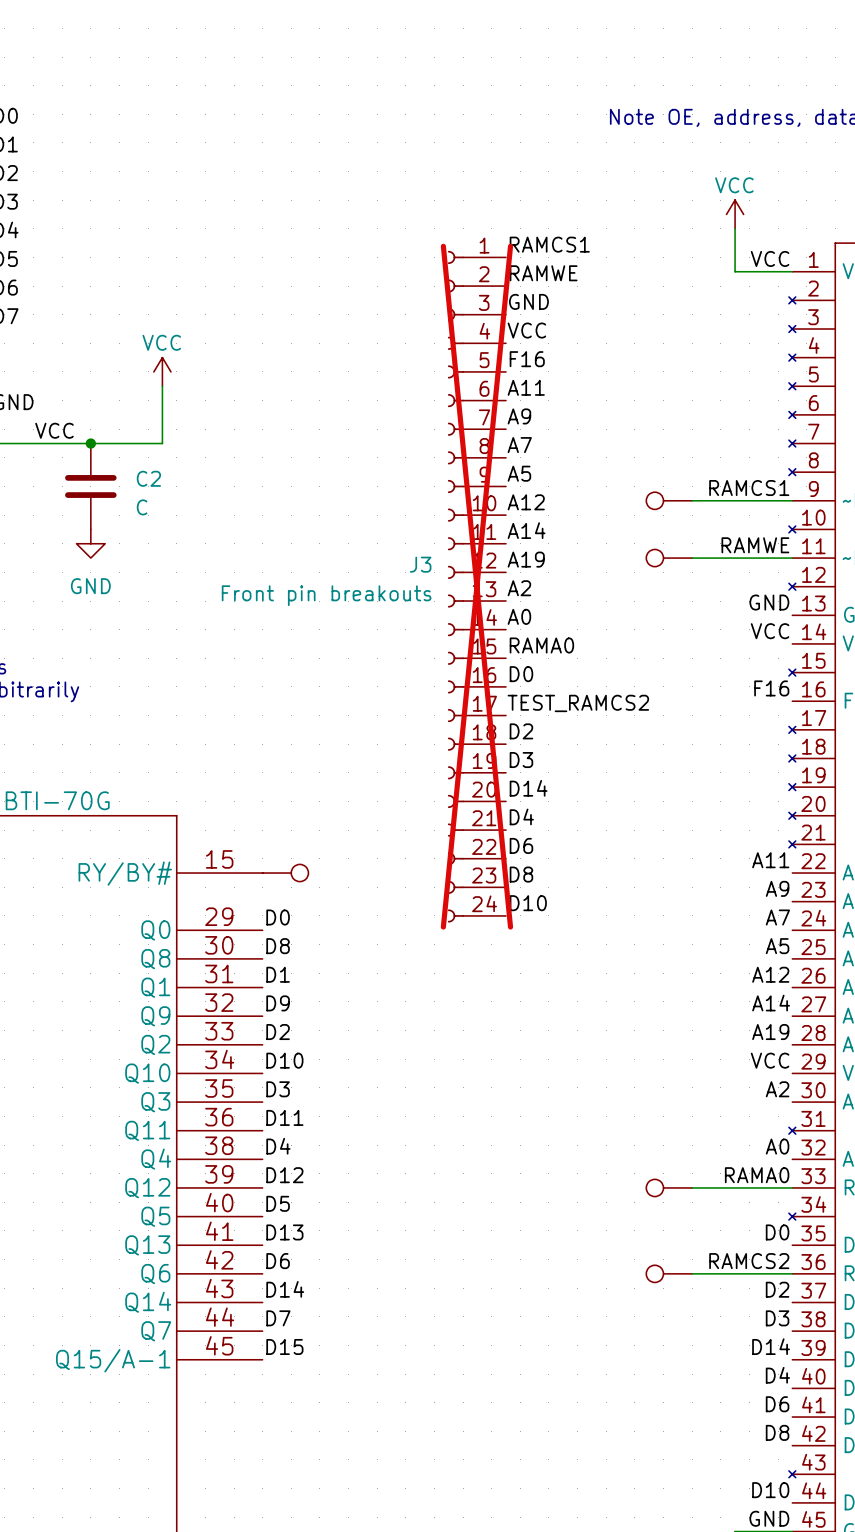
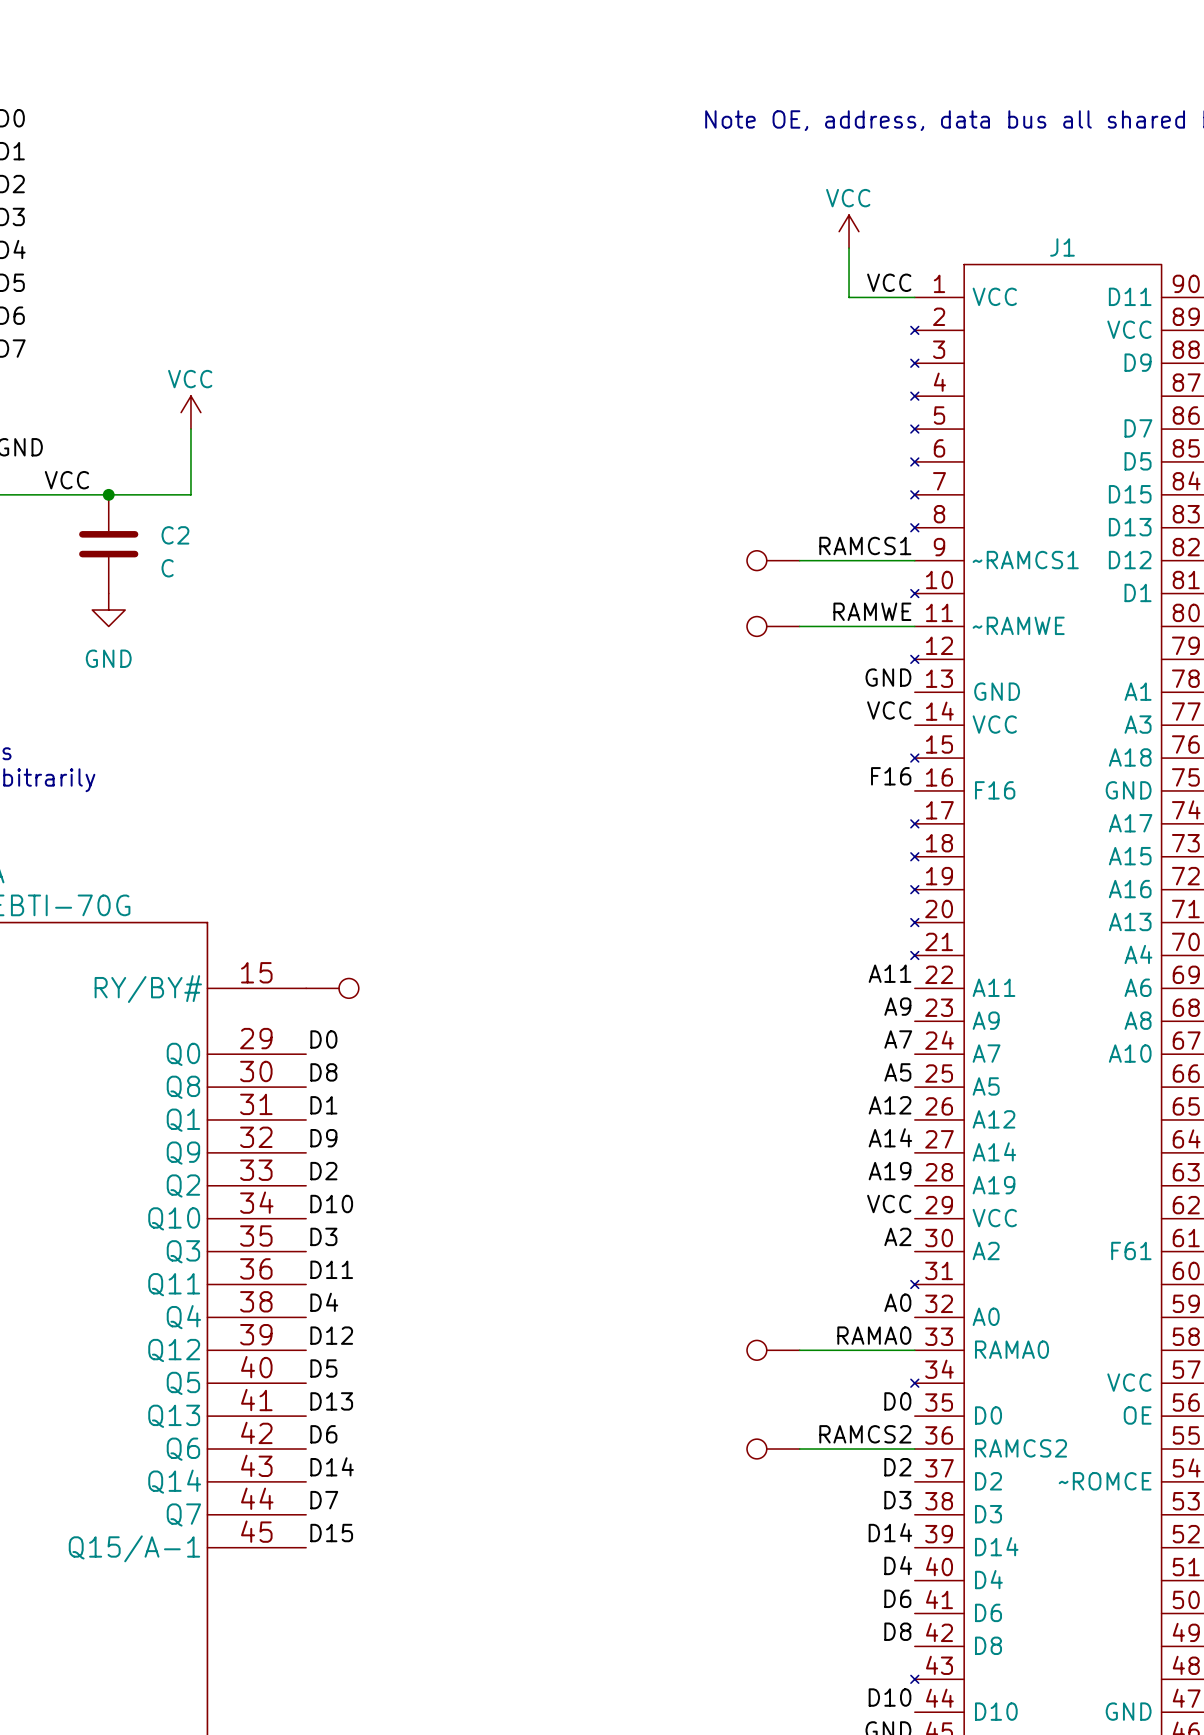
label: RAMCS1 (549, 244) -> none
label: RAMWE (543, 273) -> none
label: GND (528, 301) -> none
label: VCC (526, 330) -> none
label: F16 (527, 359) -> none
label: A11 (526, 387) -> none
label: A9 (519, 416) -> none
label: A7 (519, 445) -> none
label: A5 (519, 473) -> none
label: A12 (526, 502) -> none
label: A14 (526, 530) -> none
label: A19 (526, 559) -> none
J3: Front pin breakouts (476, 586) -> none
label: A2 (519, 588) -> none
label: A0 (519, 616) -> none
label: RAMA0 (541, 645) -> none
label: D0 (521, 674) -> none
label: TEST_RAMCS2 (578, 703) -> none
label: D2 (521, 731) -> none
label: D3 (521, 760) -> none
label: D14 (528, 788) -> none
label: D4 (521, 816) -> none
label: D6 (521, 845) -> none
label: D8 (521, 874) -> none
label: D10 (528, 903) -> none

